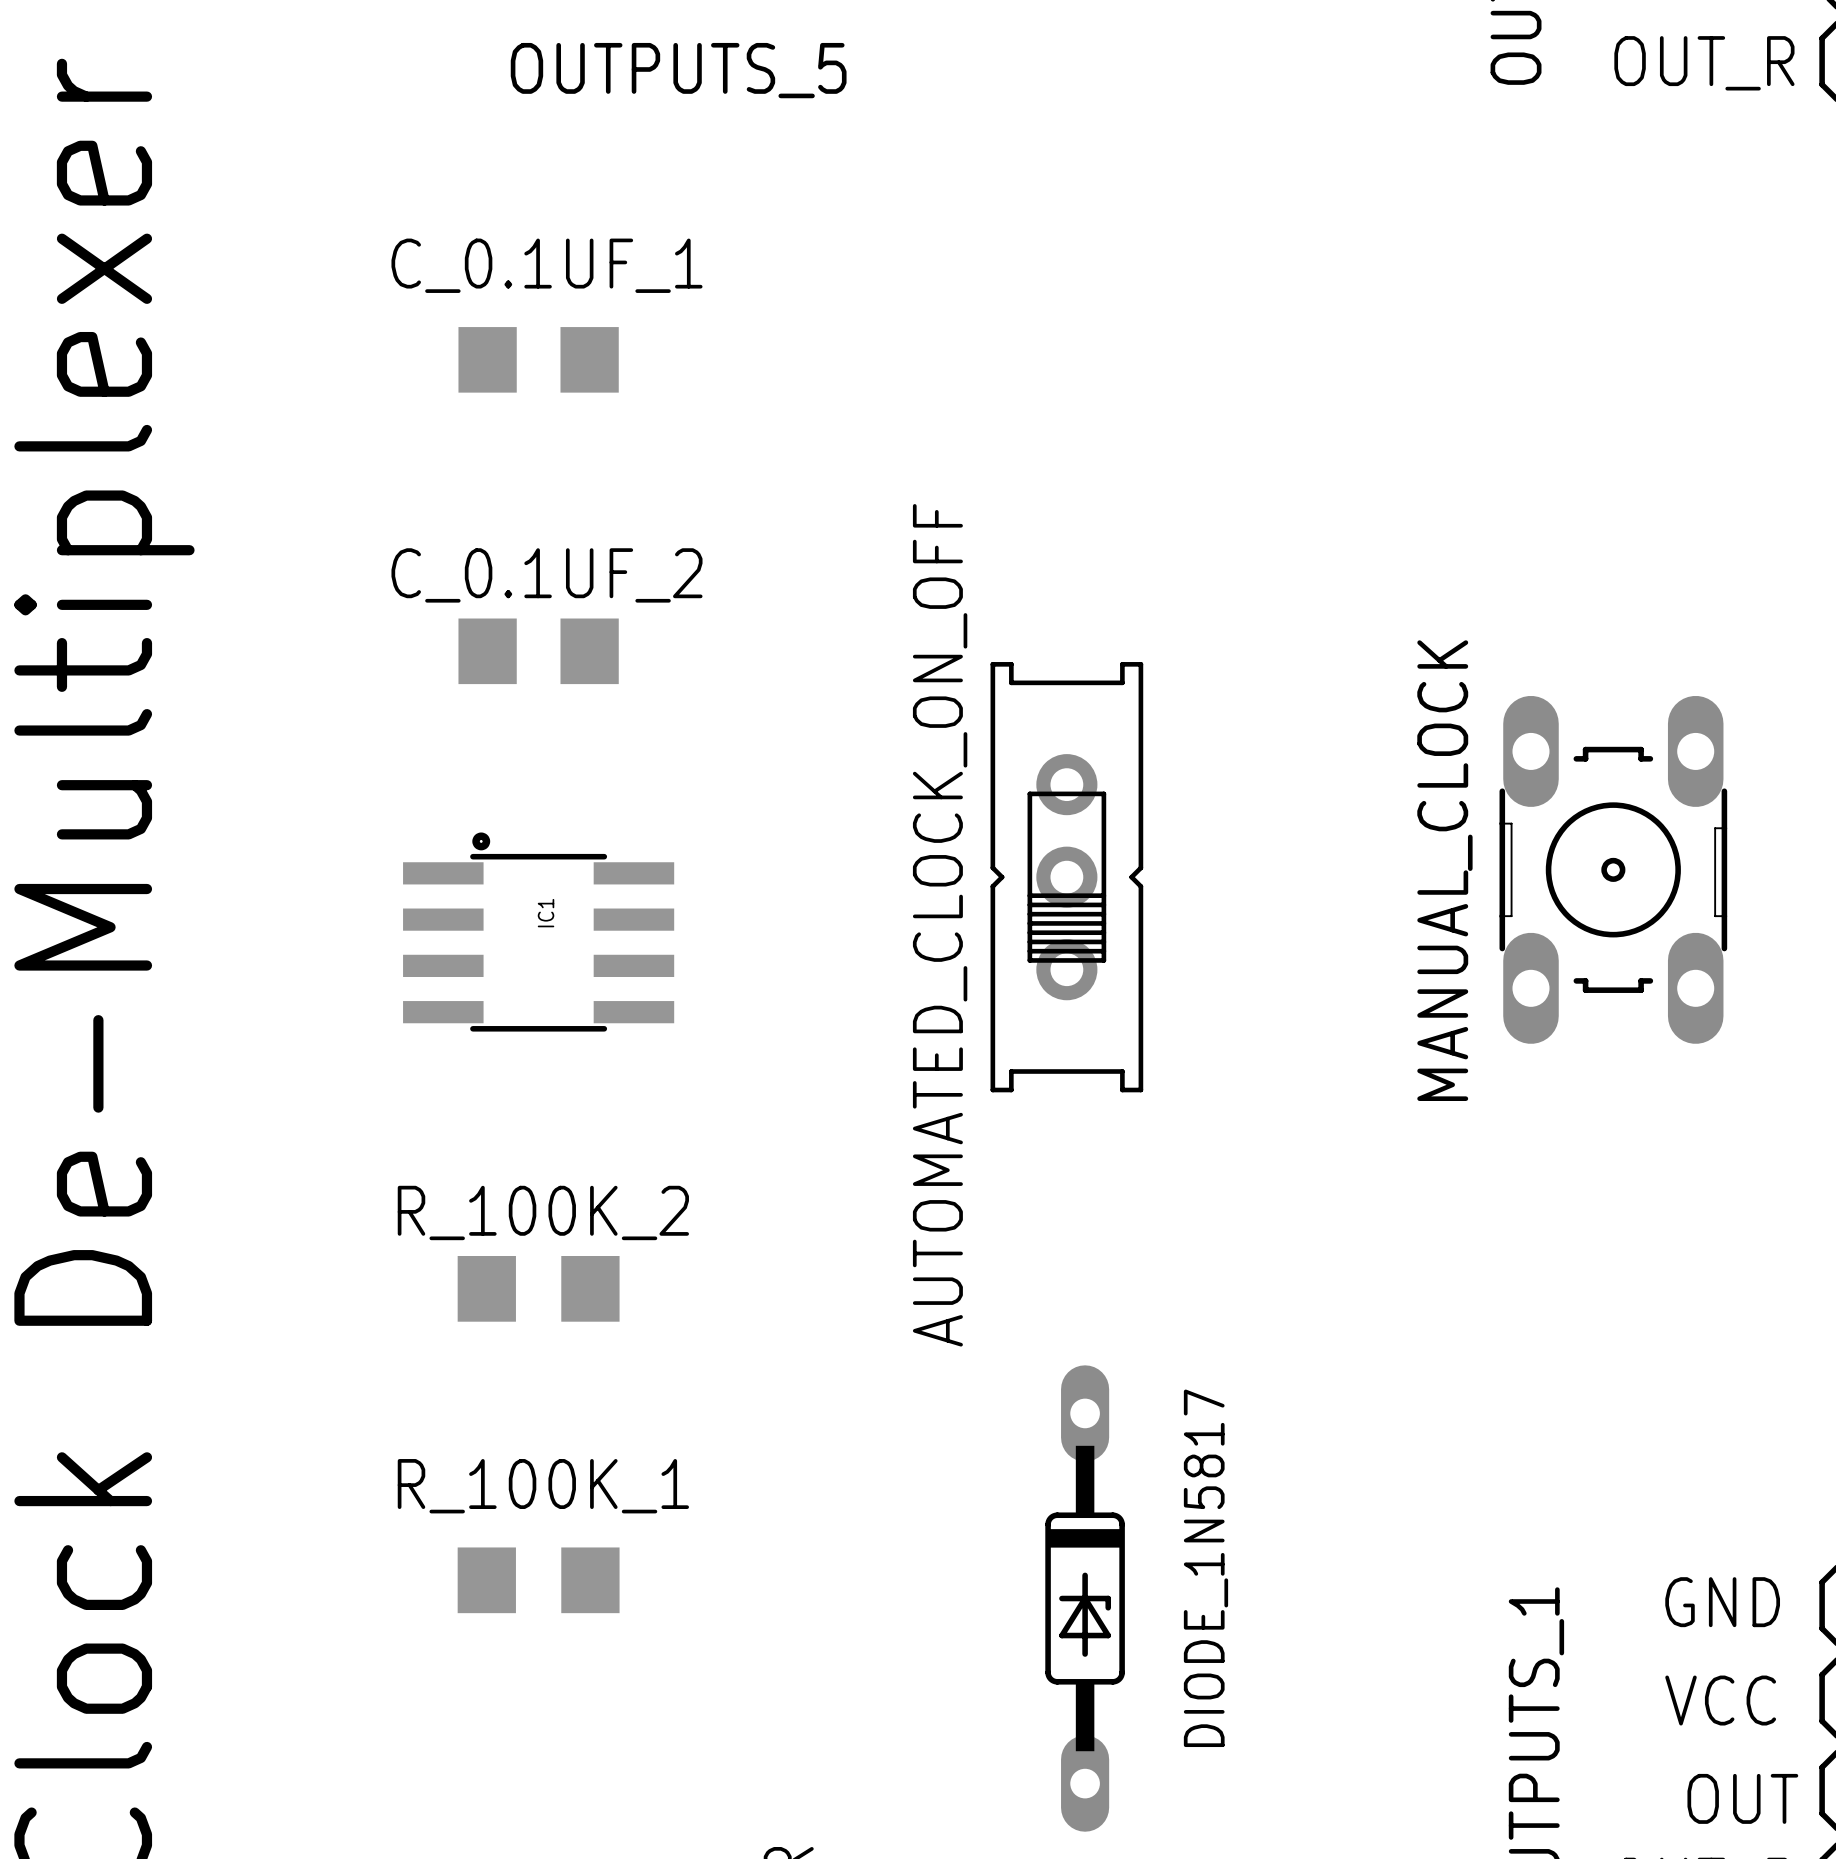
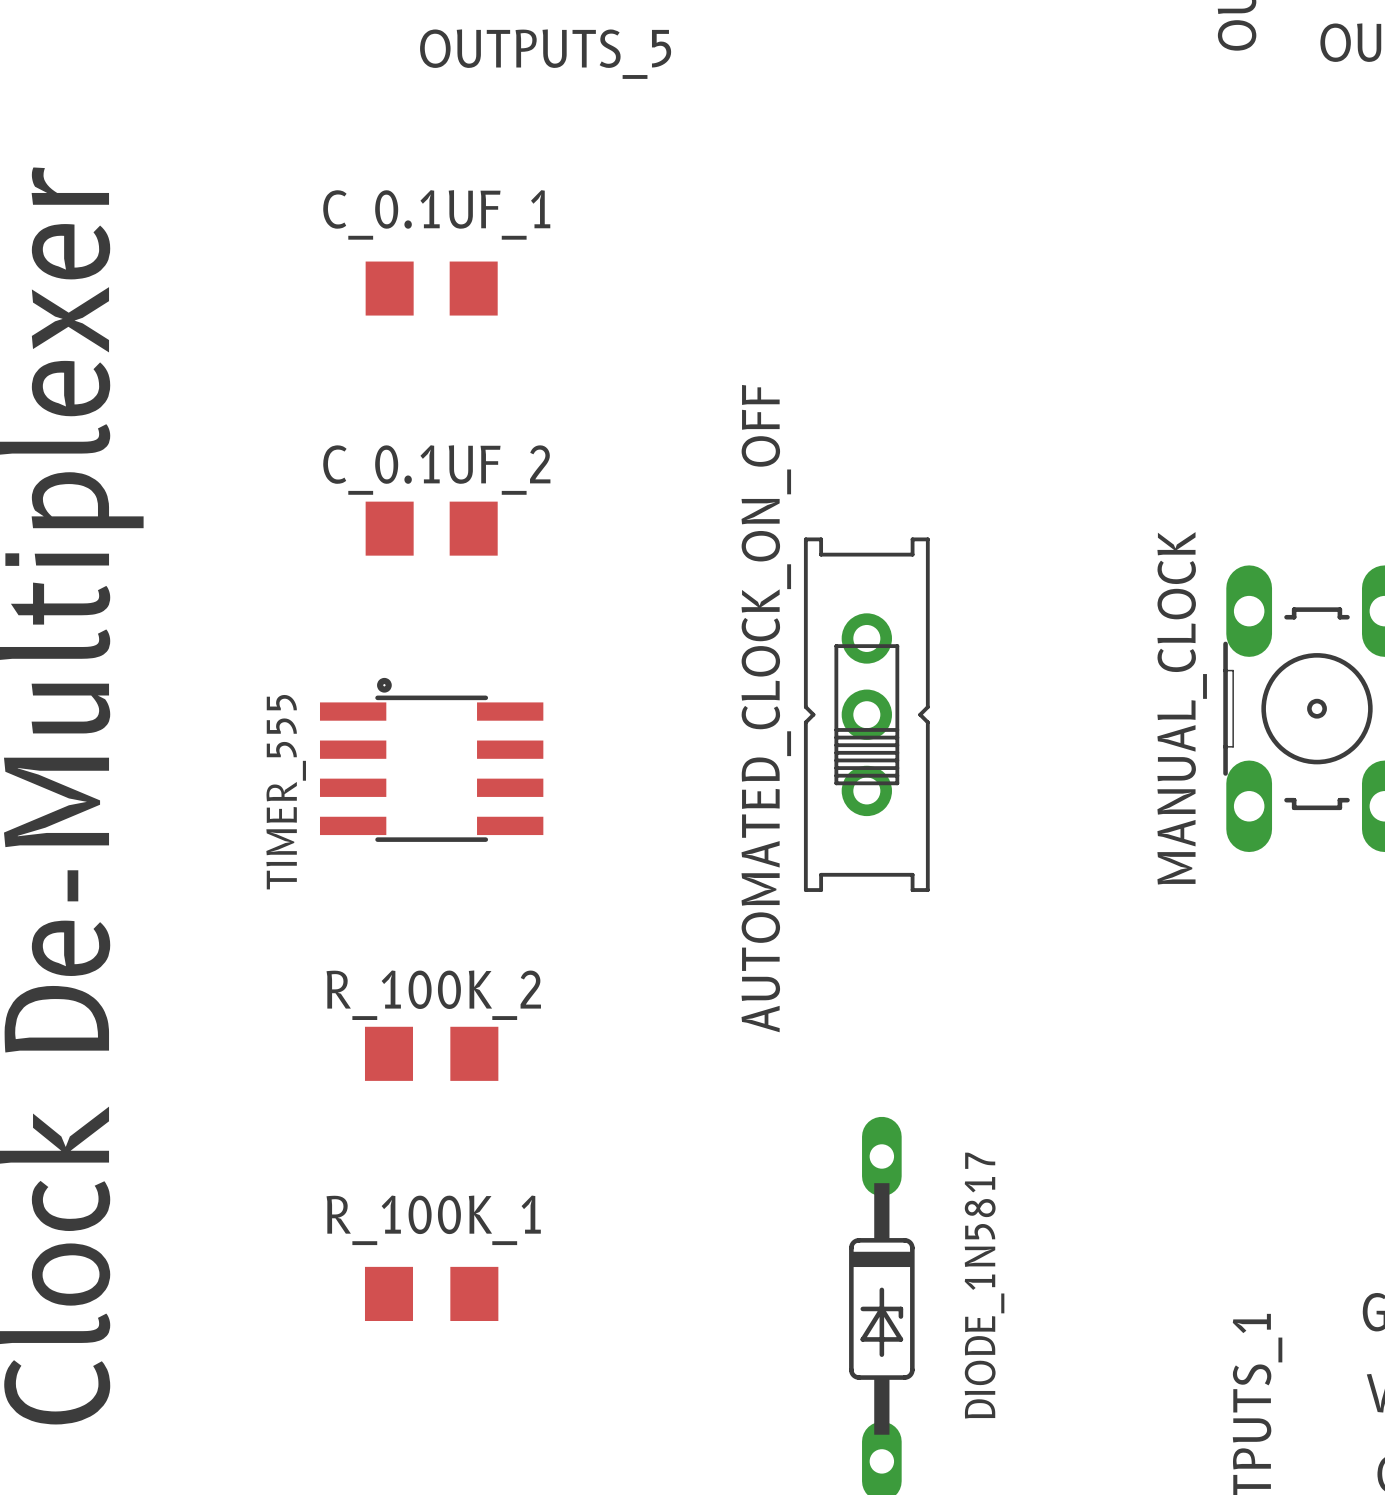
IC1 name: IC1 (546, 913) -> TIMER_555 (286, 792)
AUTOMATED_CLOCK_ON_OFF name position: AUTOMATED_CLOCK_ON_OFF (940, 925) -> AUTOMATED_CLOCK_ON_OFF (766, 708)

